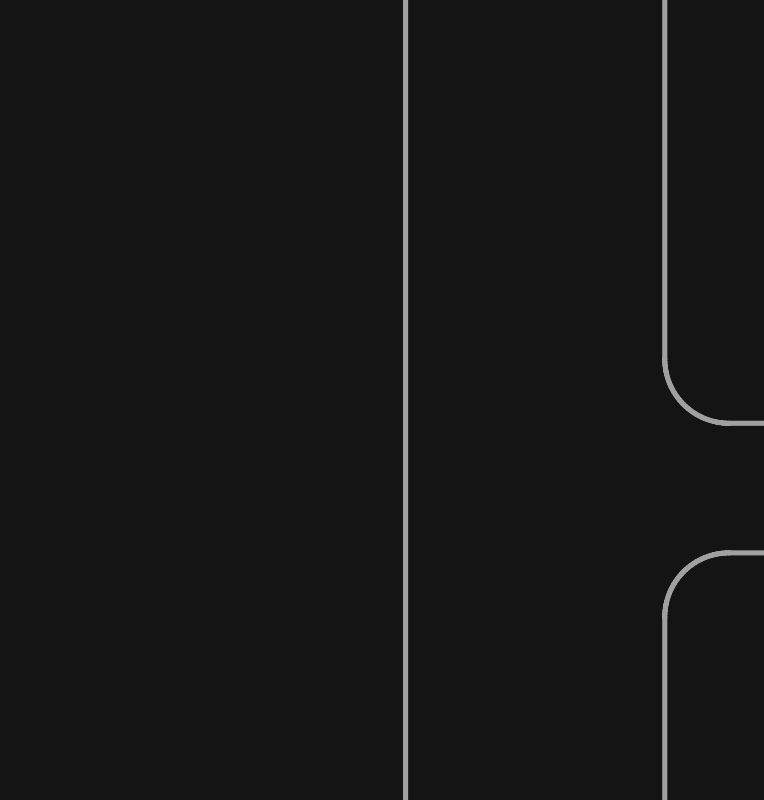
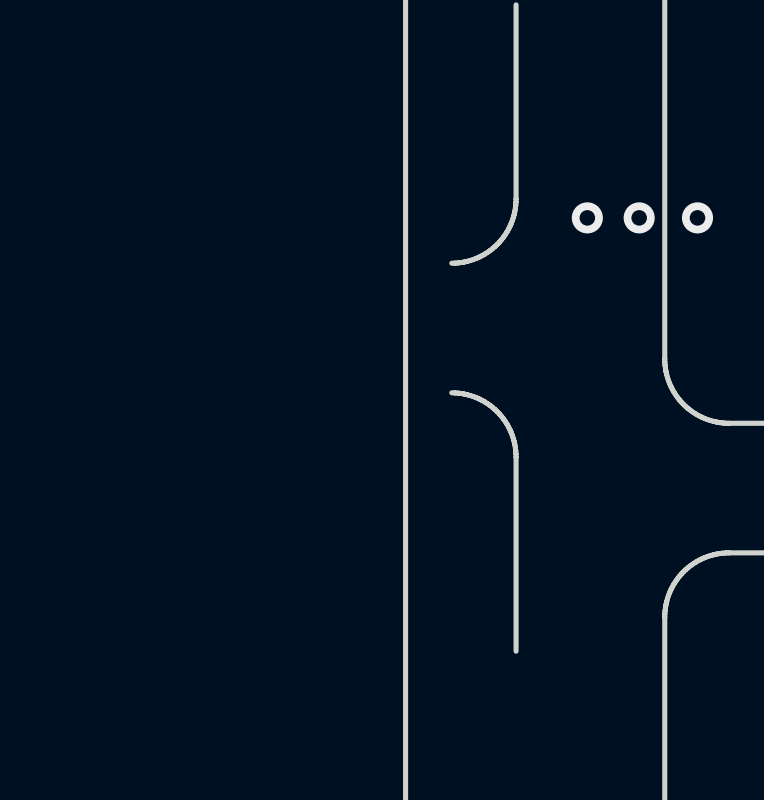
board edge: none -> (516, 4) (516, 198) (514, 214) (505, 234) (490, 250) (470, 260) (451, 263)
via: none -> (587, 217)
via: none -> (639, 217)
via: none -> (697, 217)
board edge: none -> (451, 392) (470, 395) (490, 405) (505, 421) (514, 441) (516, 457) (516, 651)

